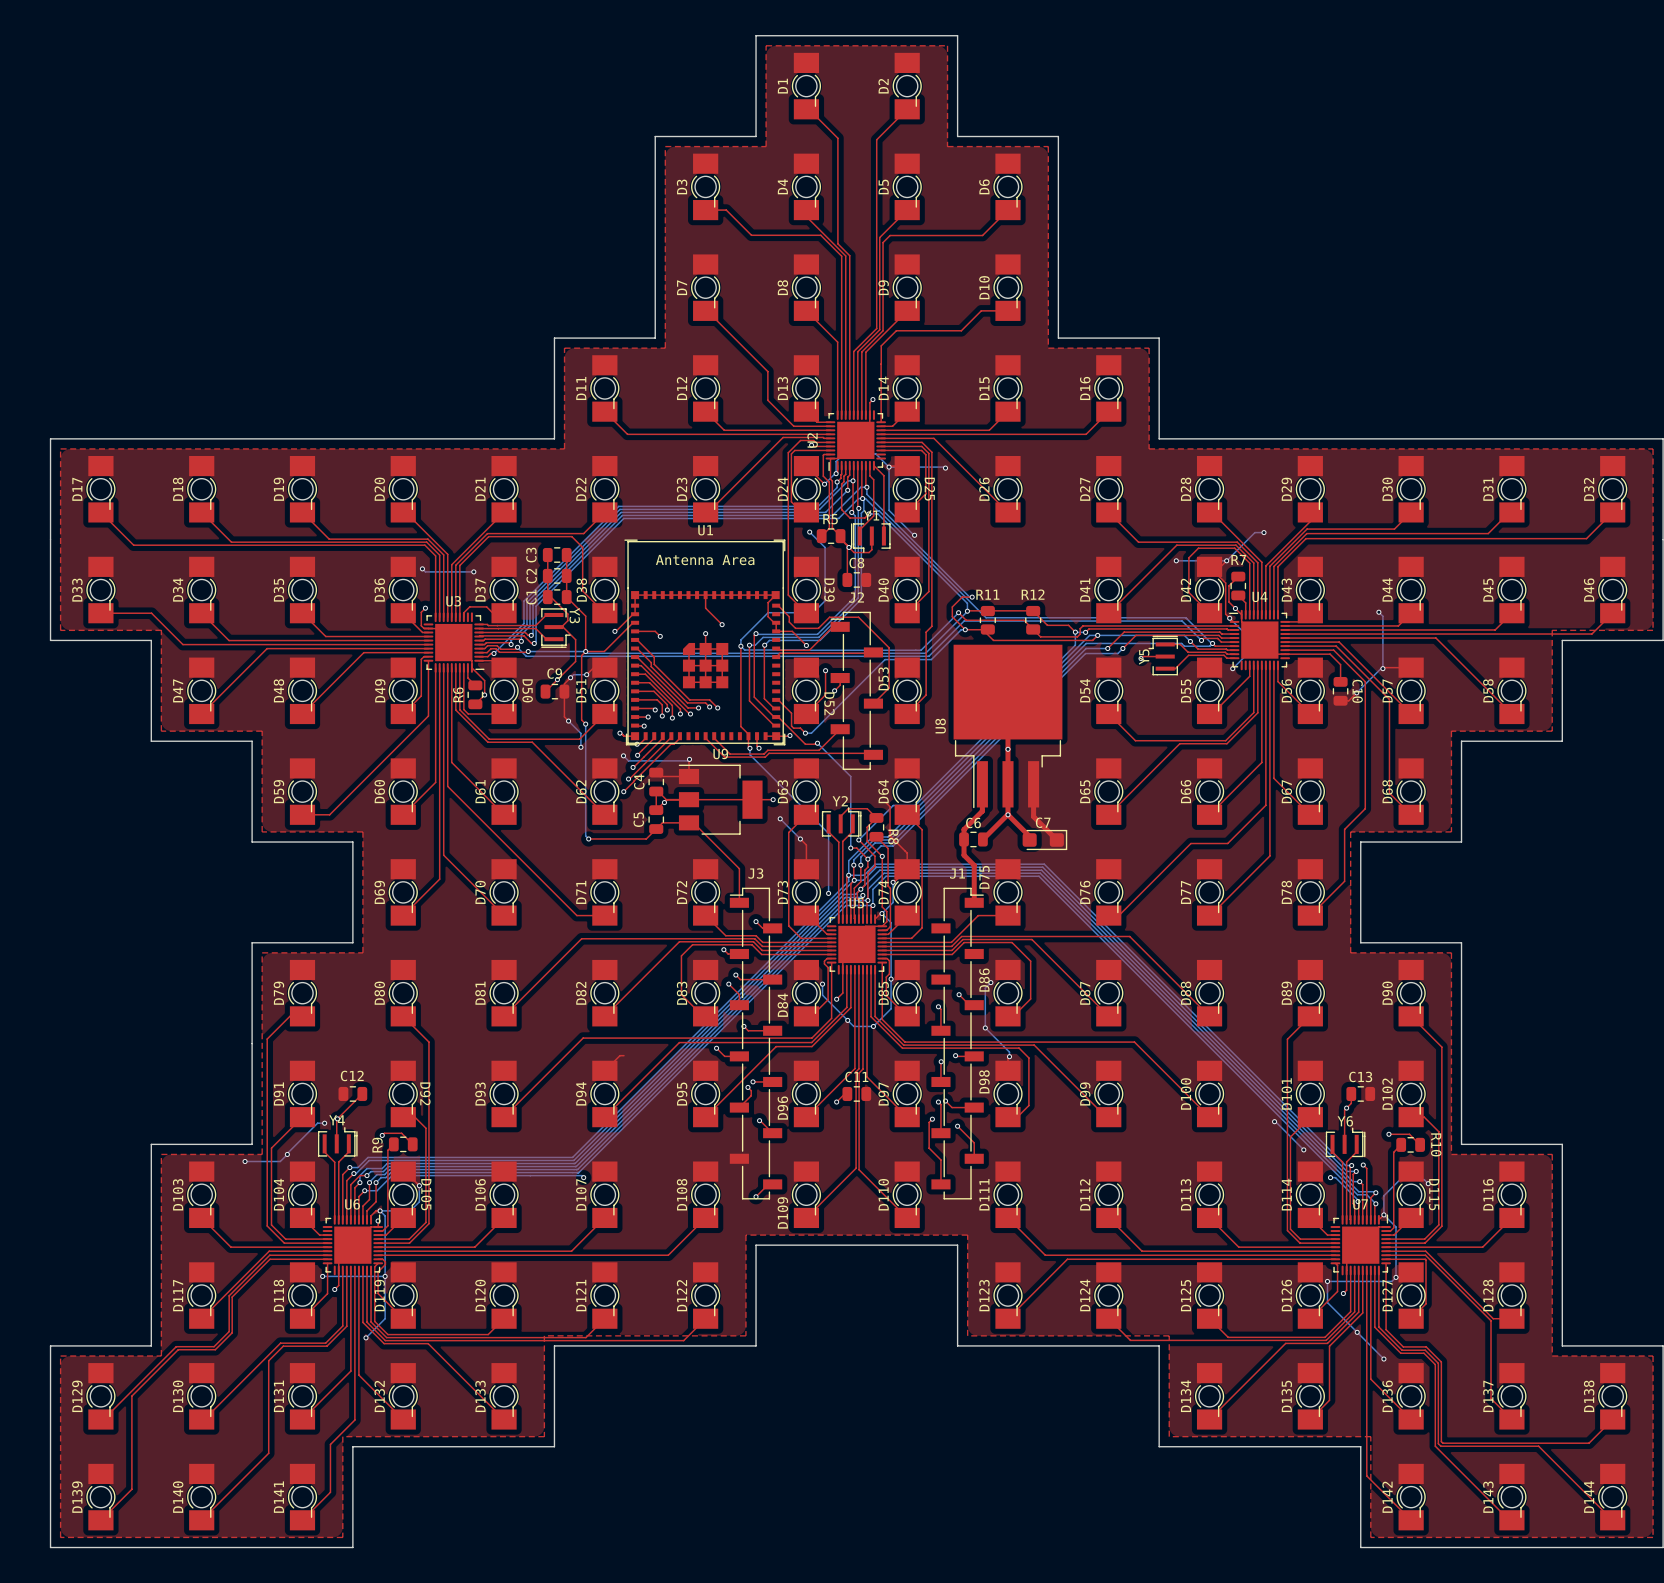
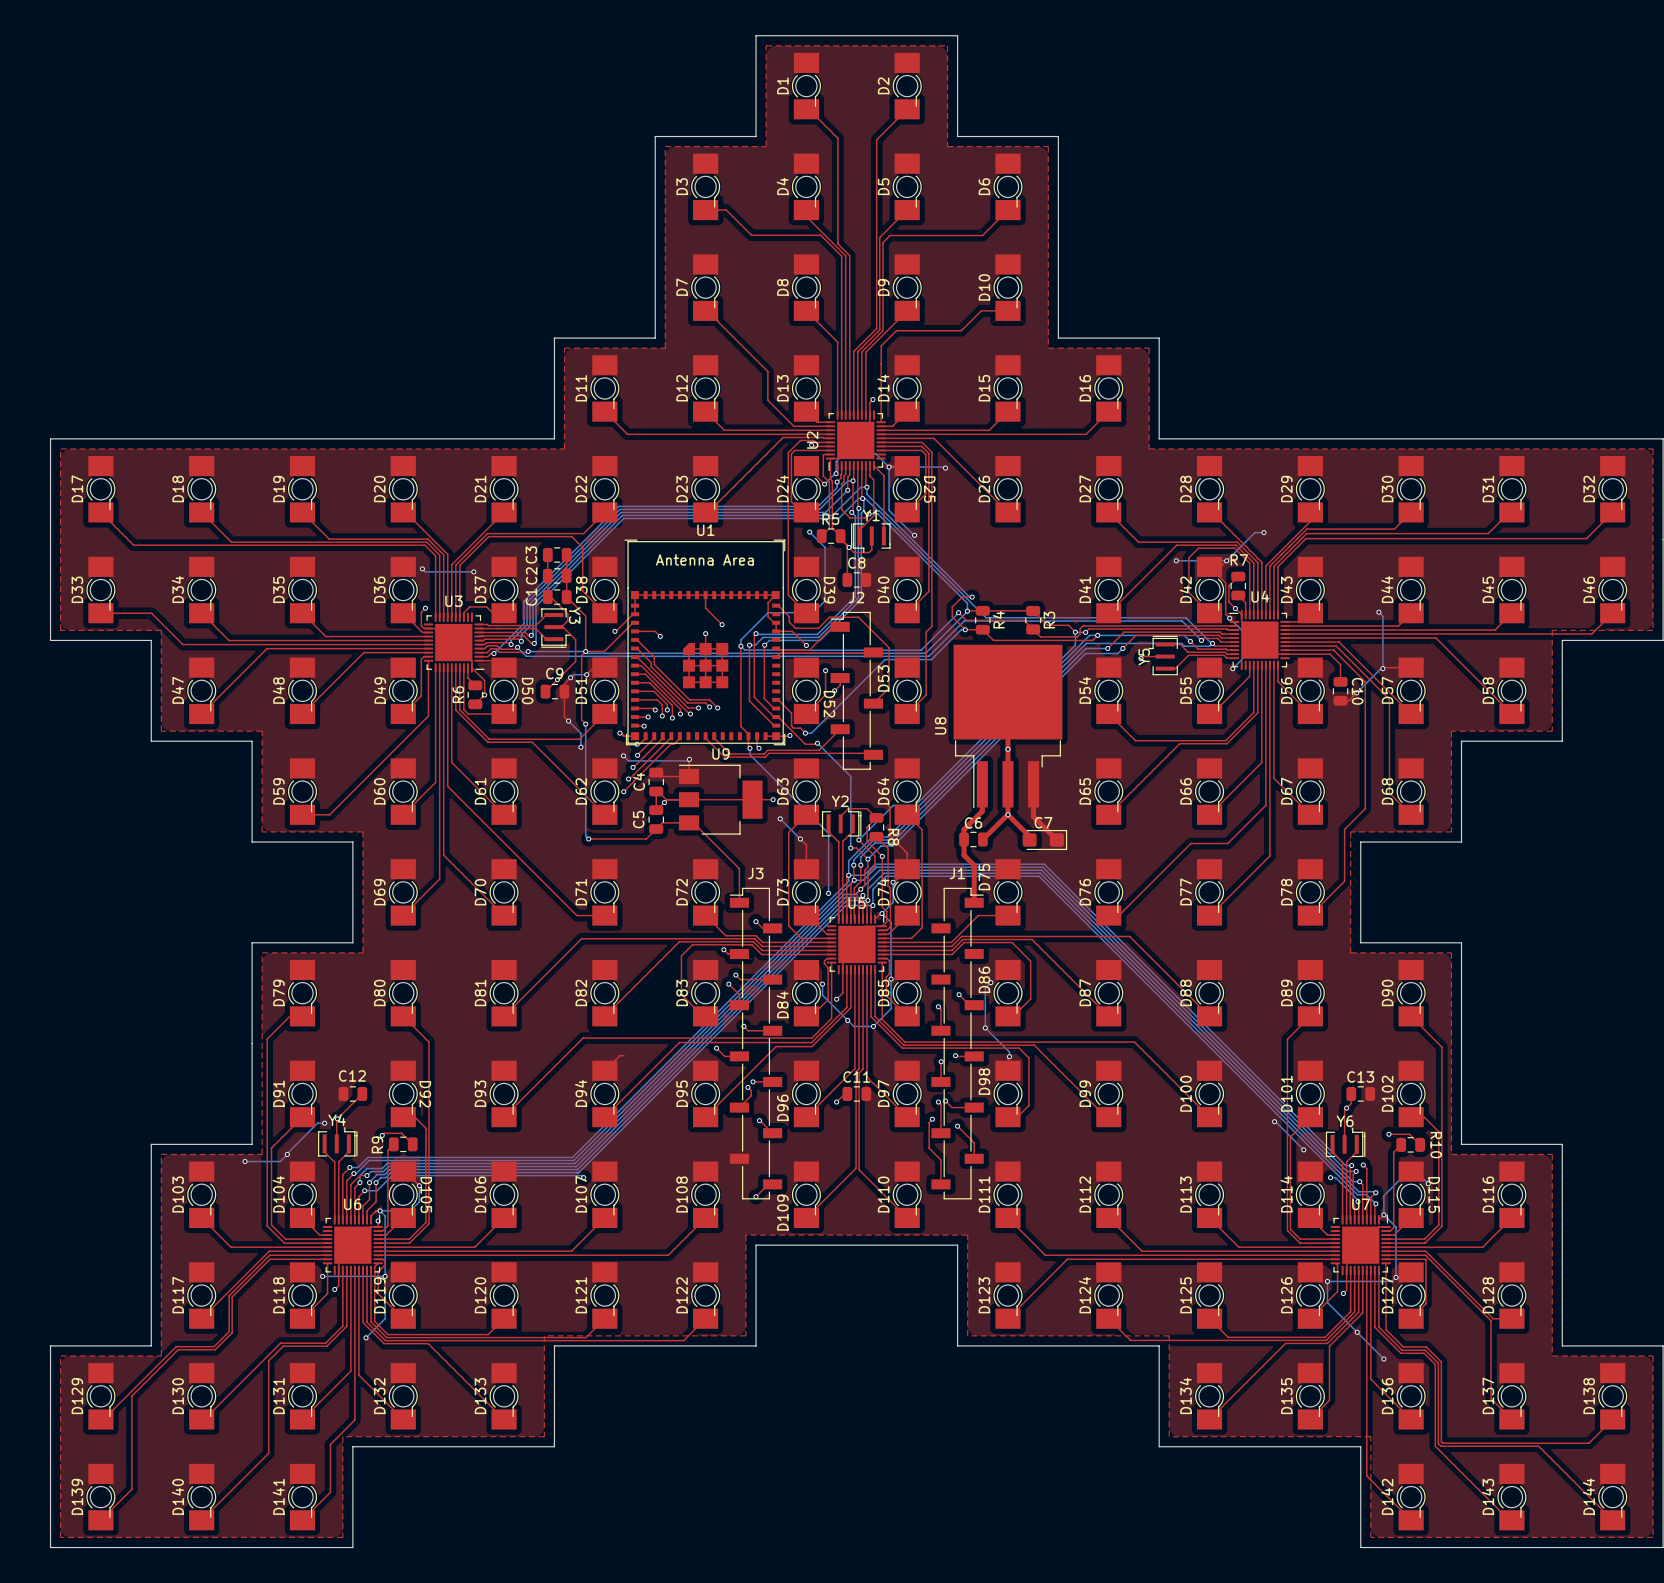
R12 name: R12 (1033, 594) -> R3 (1049, 620)
R4: none -> (982, 620)
R11: (987, 620) -> none

